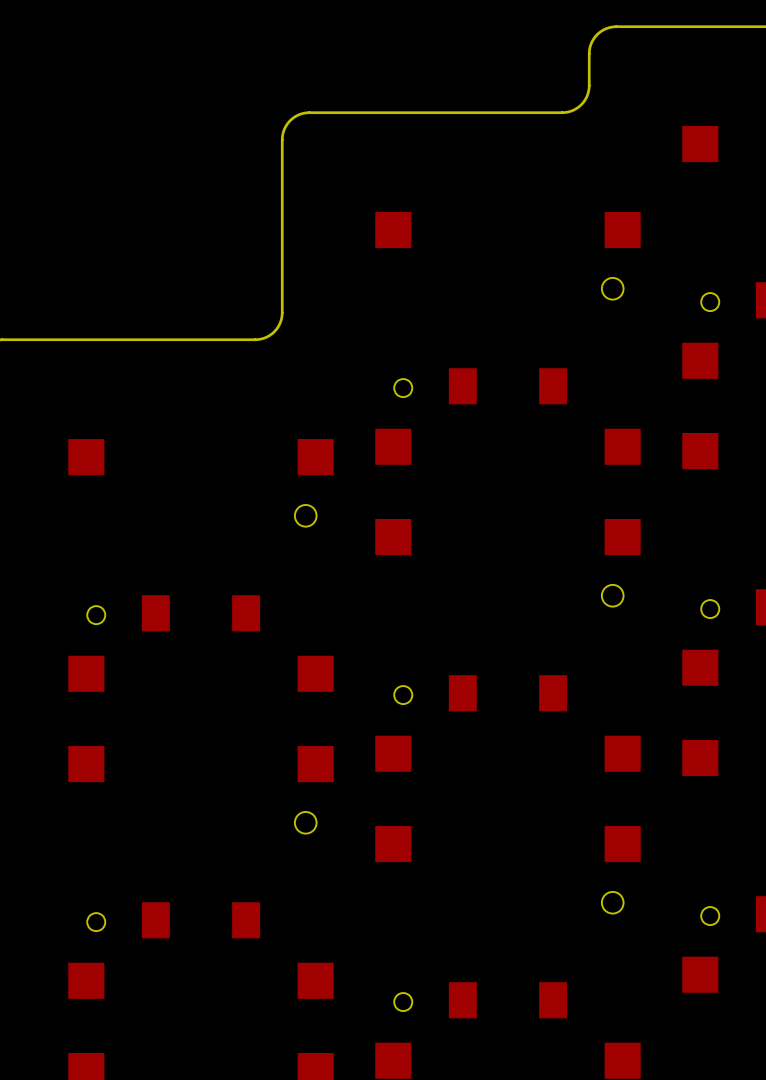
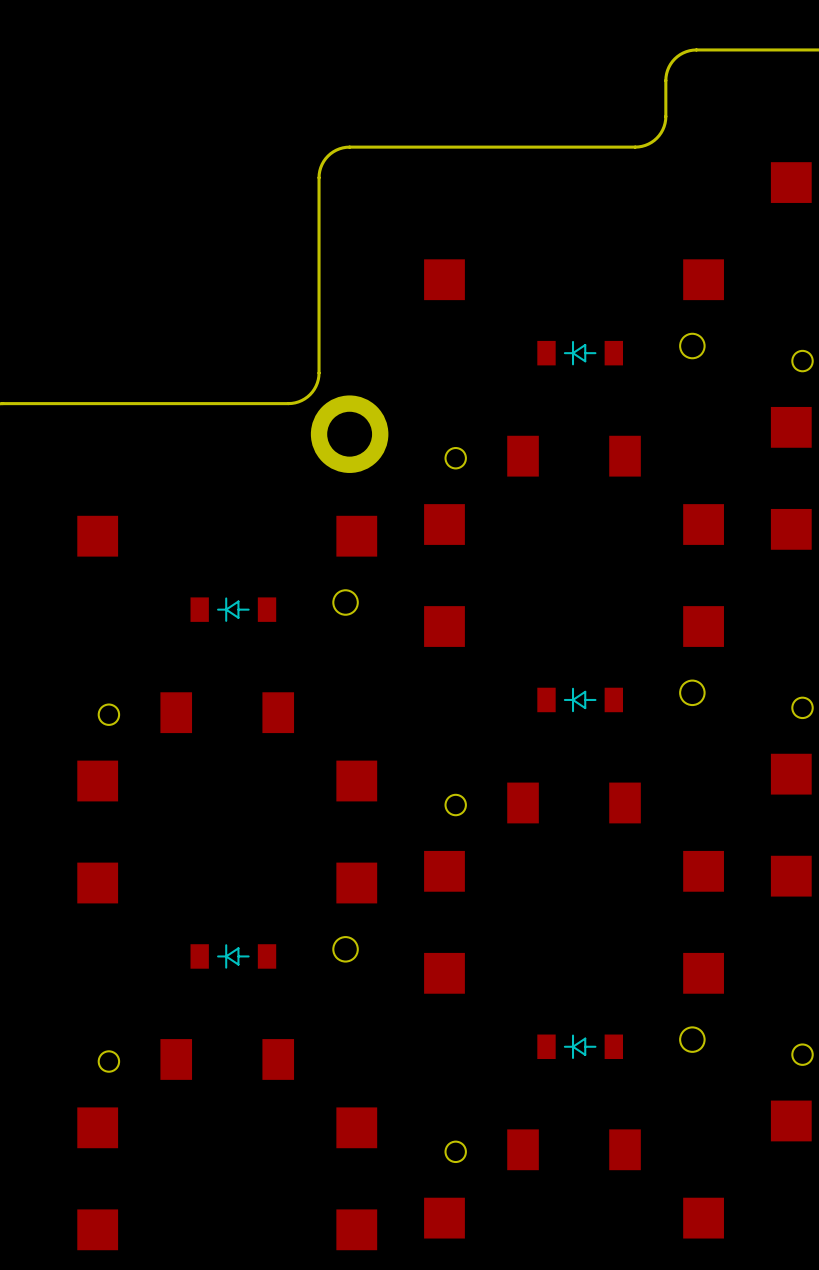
part: none -> (580, 353)
part: none -> (349, 434)
part: none -> (233, 609)
part: none -> (580, 699)
part: none -> (233, 956)
part: none -> (580, 1046)

